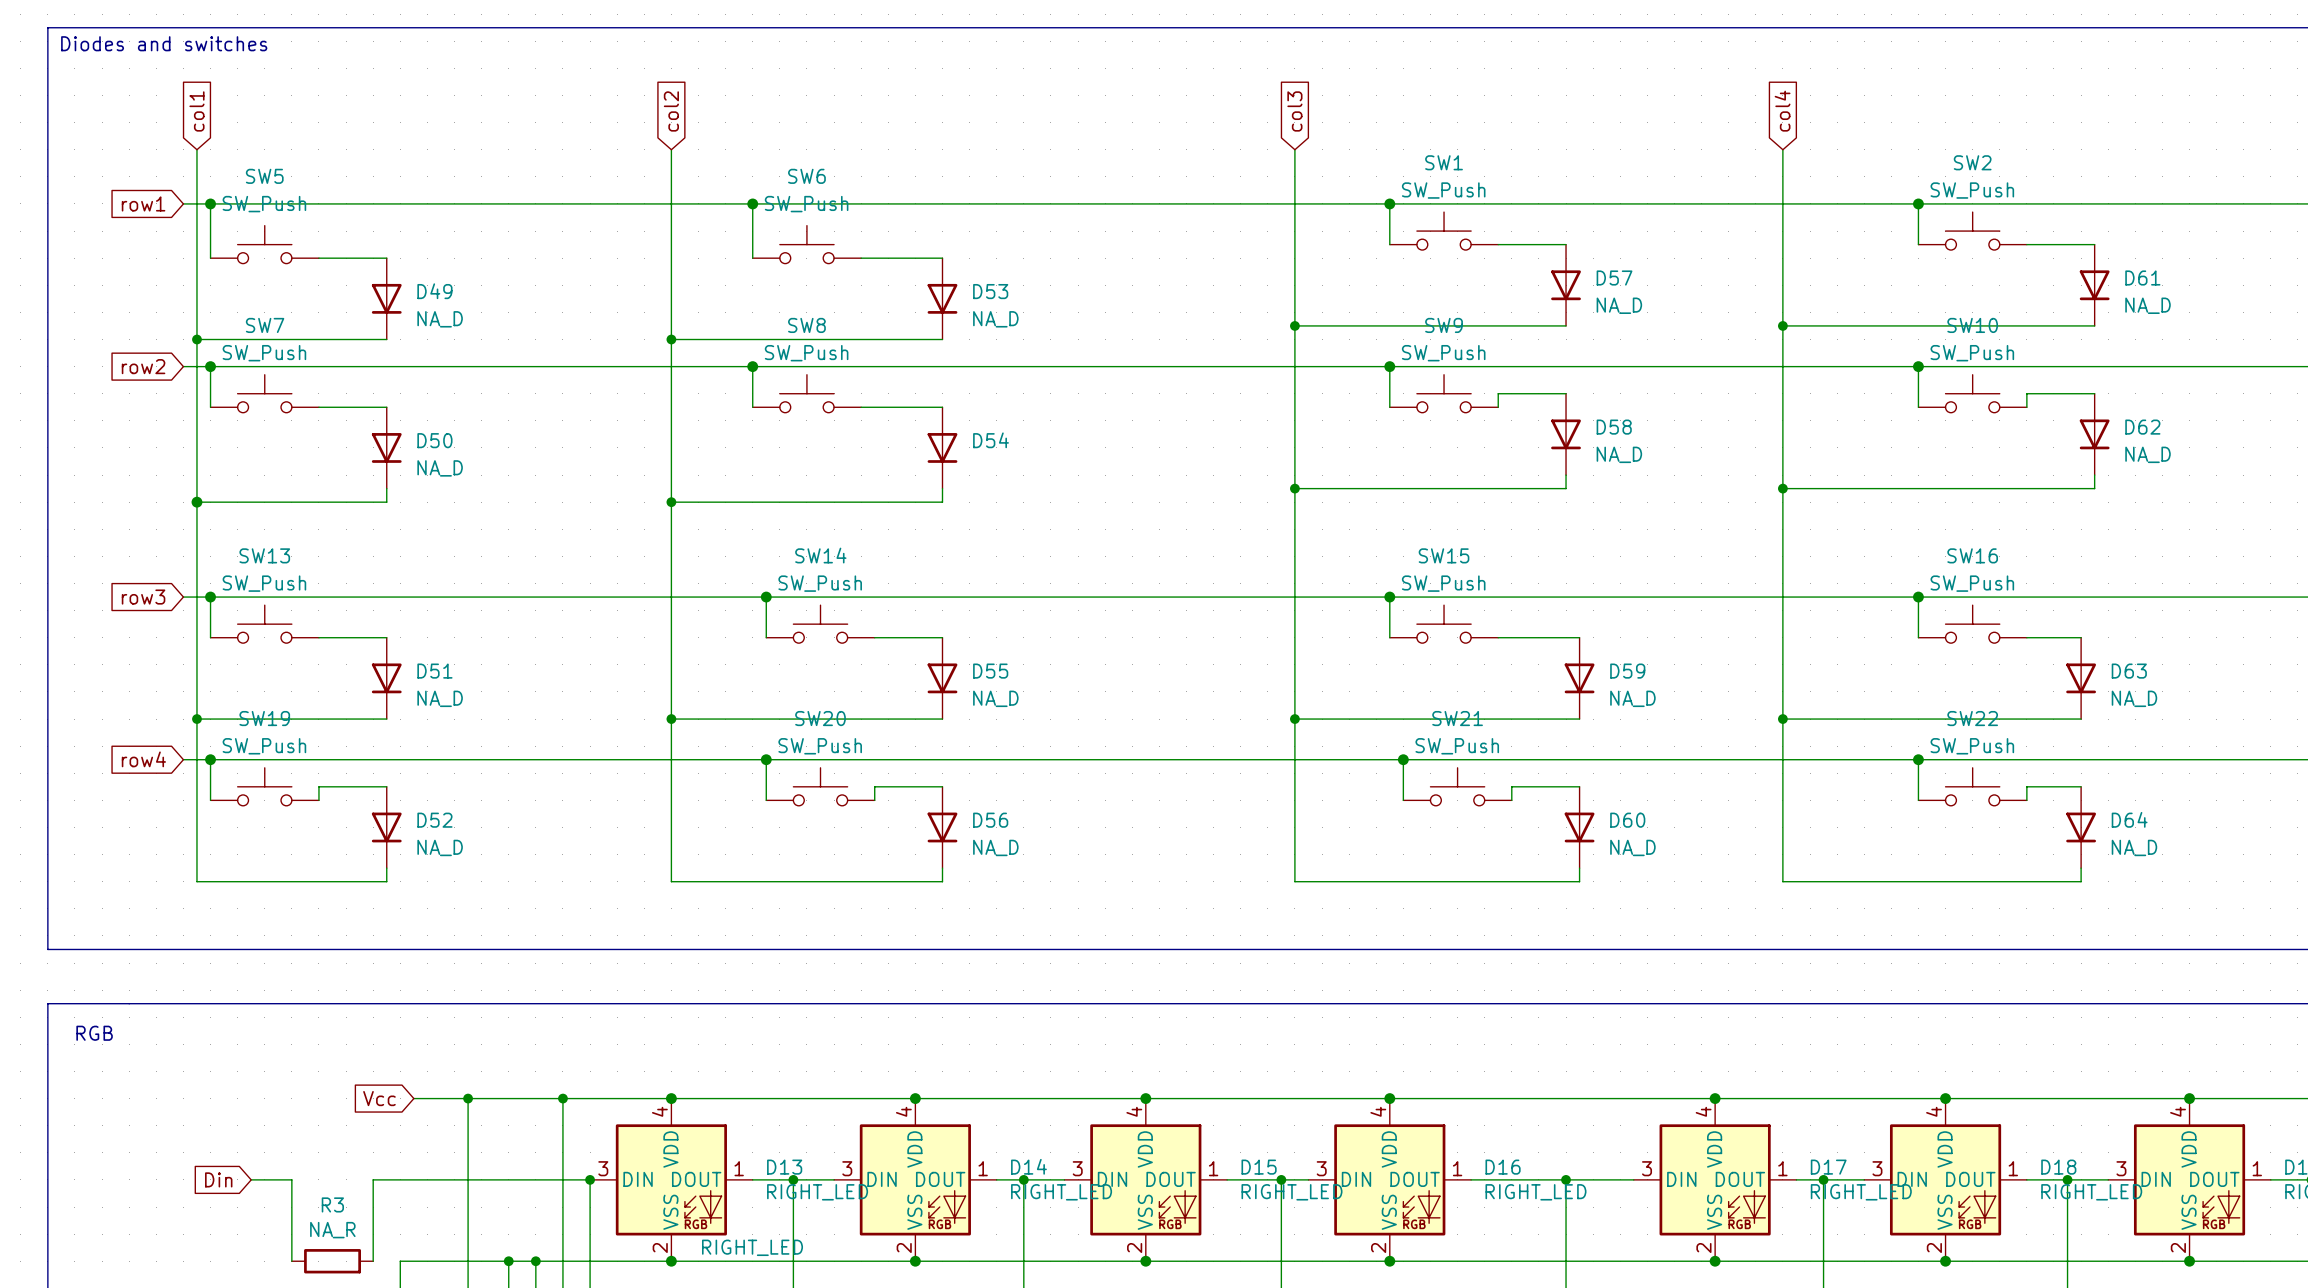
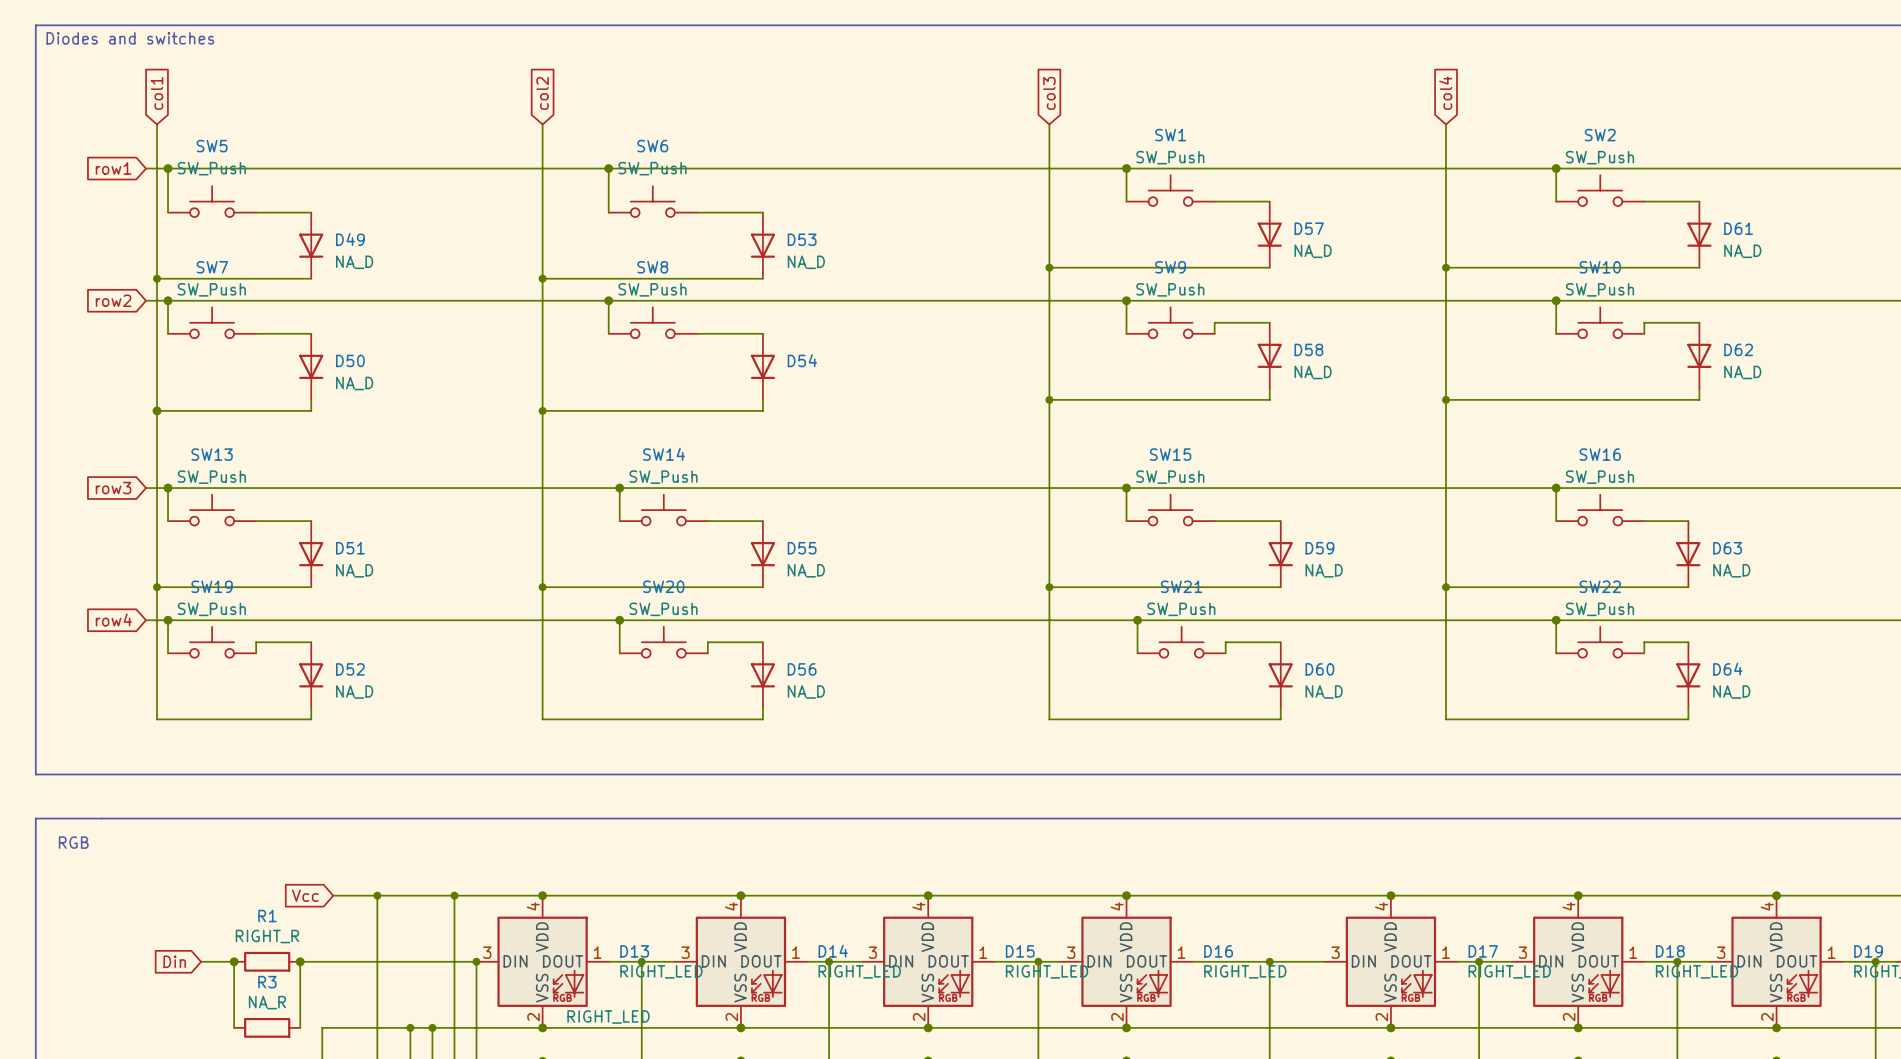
junction: none -> (234, 961)
R1: none -> RIGHT_R (267, 961)
junction: none -> (300, 961)

